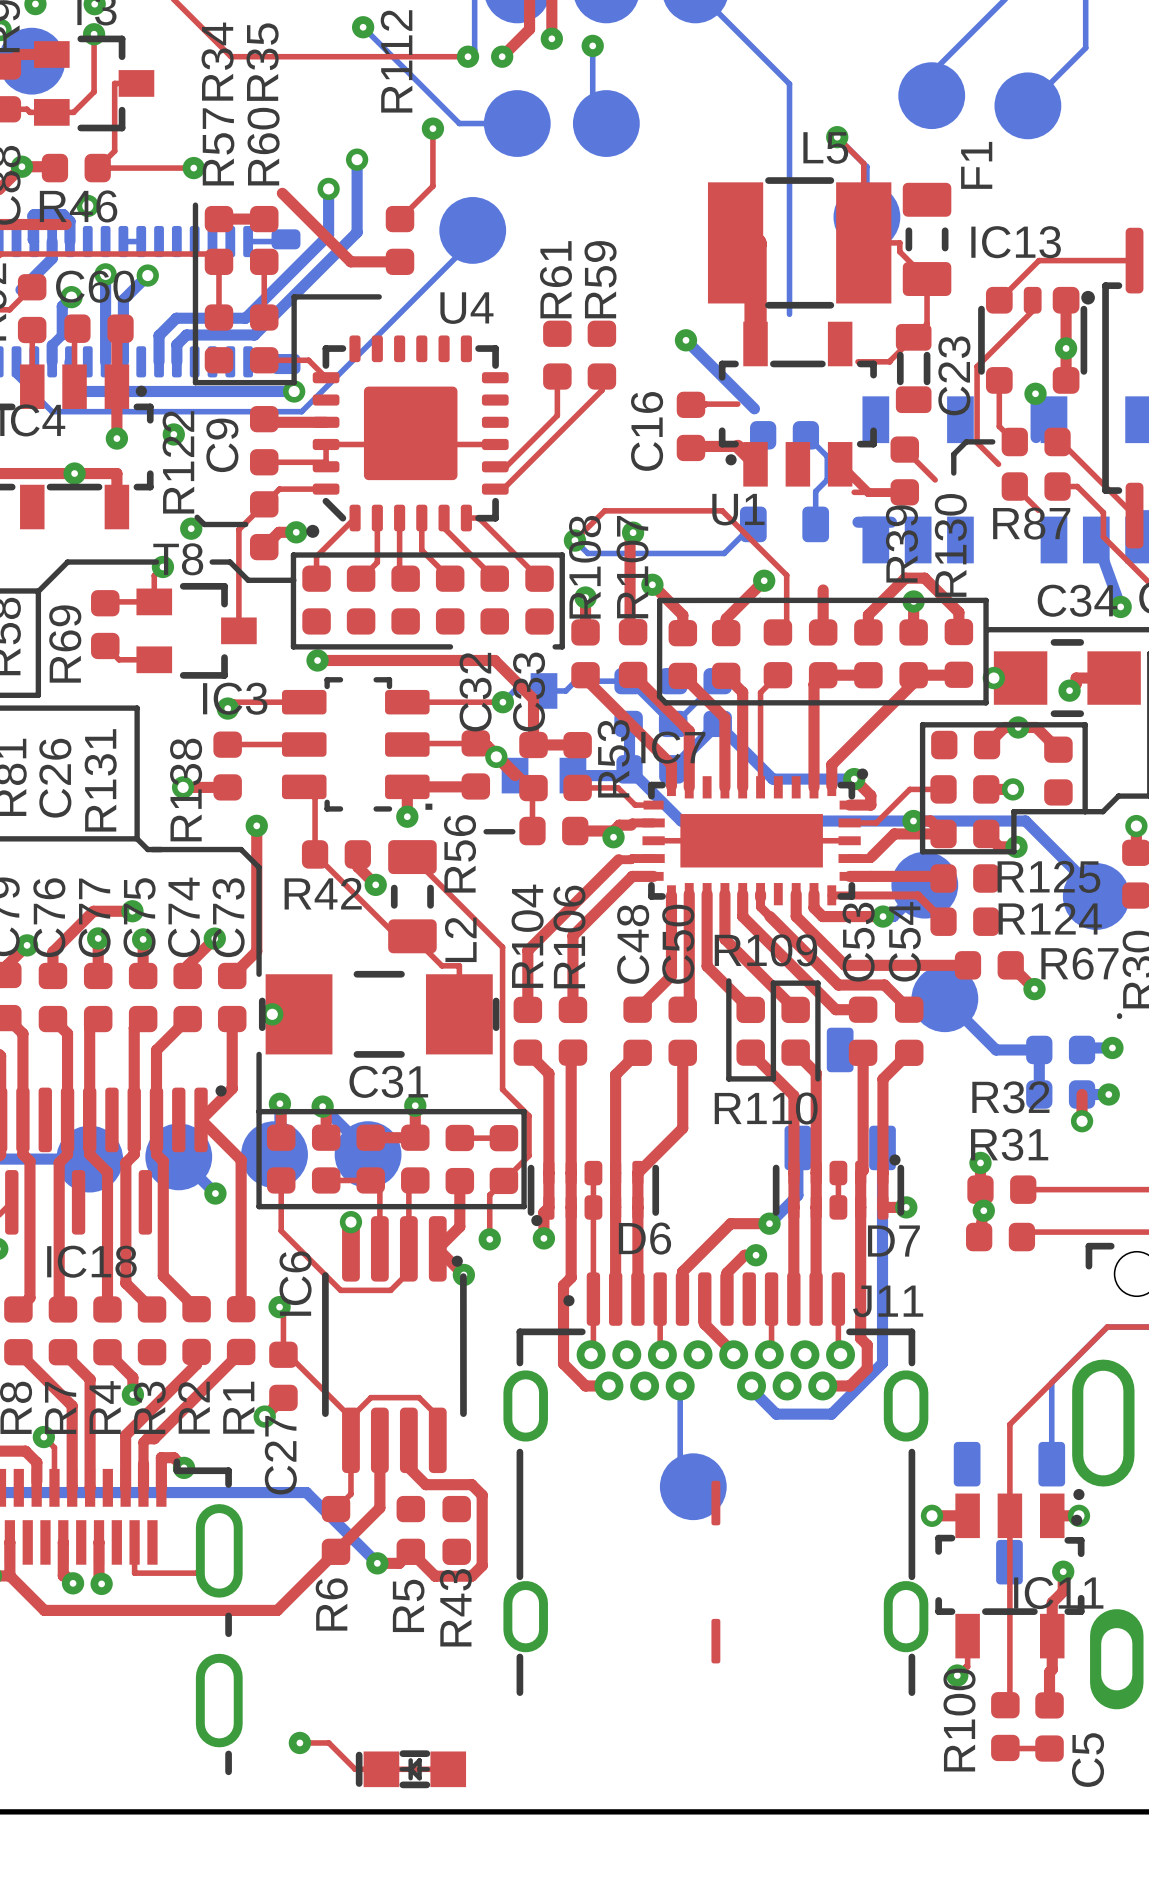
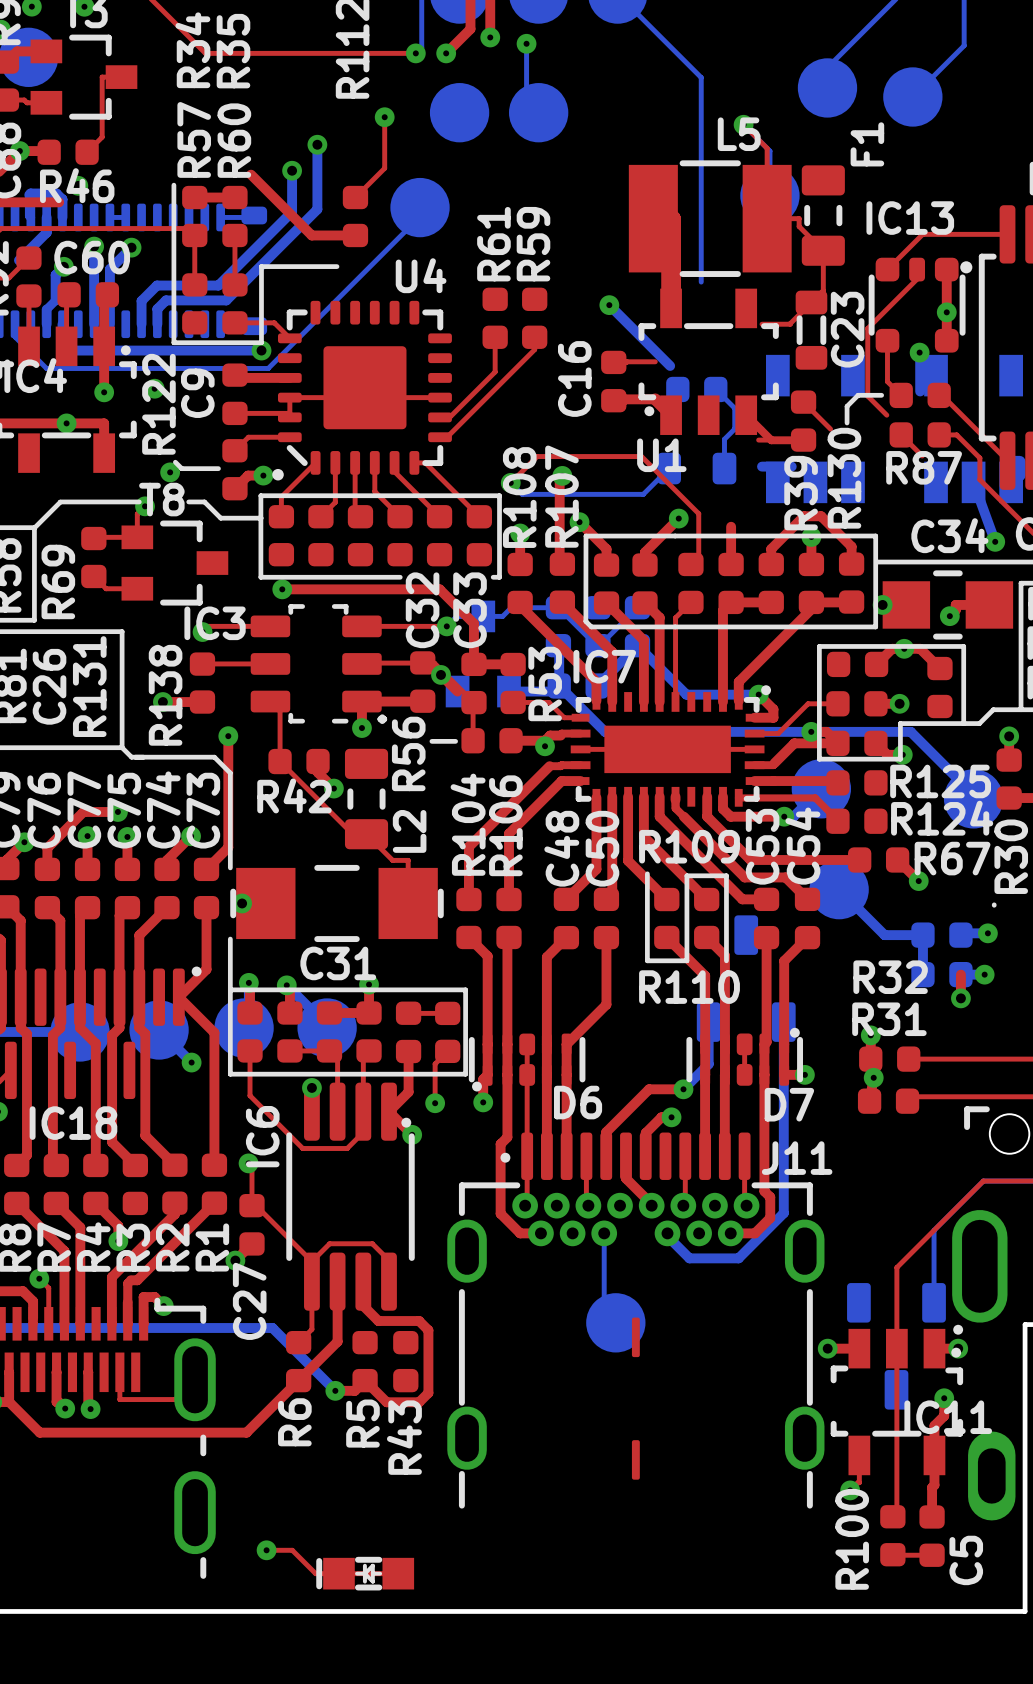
bottom track: (363, 27) (459, 123) (517, 123) -> none
via: (363, 27) -> none
top track: (94, 34) (94, 91) (73, 112) (51, 112) -> none
via: (94, 34) -> none
top track: (97, 168) (193, 168) -> none
via: (193, 168) -> none
top track: (264, 504) (238, 529) (238, 630) -> none
top track: (412, 857) (502, 947) (502, 1089) (529, 1115) (529, 1155) (503, 1180) -> none

